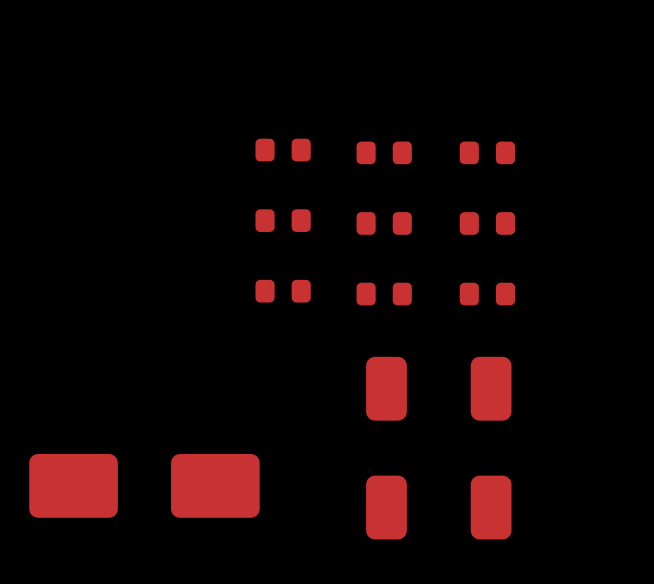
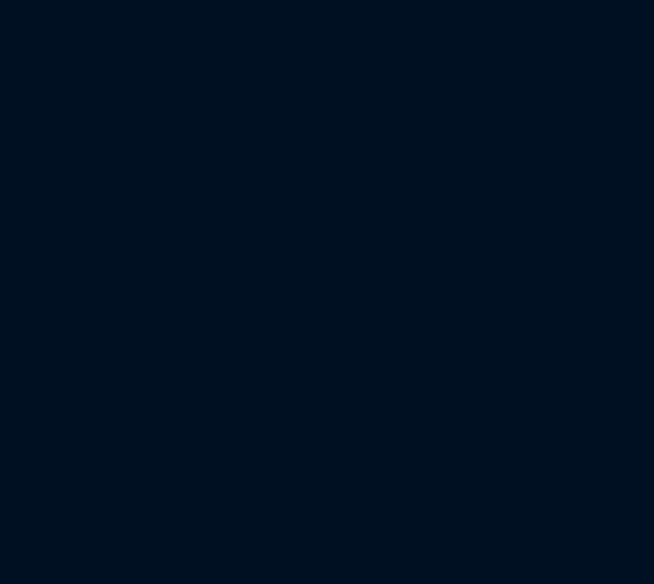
part: (283, 150) -> none
part: (384, 152) -> none
part: (487, 152) -> none
part: (283, 220) -> none
part: (384, 223) -> none
part: (487, 223) -> none
part: (283, 291) -> none
part: (384, 294) -> none
part: (487, 294) -> none
part: (438, 388) -> none
part: (144, 485) -> none
part: (438, 507) -> none

